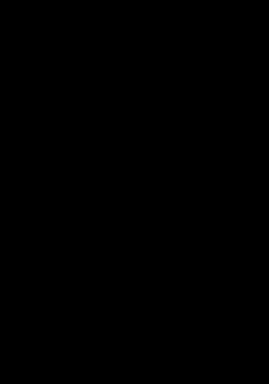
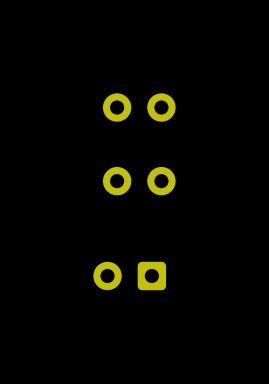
part: none -> (139, 107)
part: none -> (139, 181)
part: none -> (129, 275)

